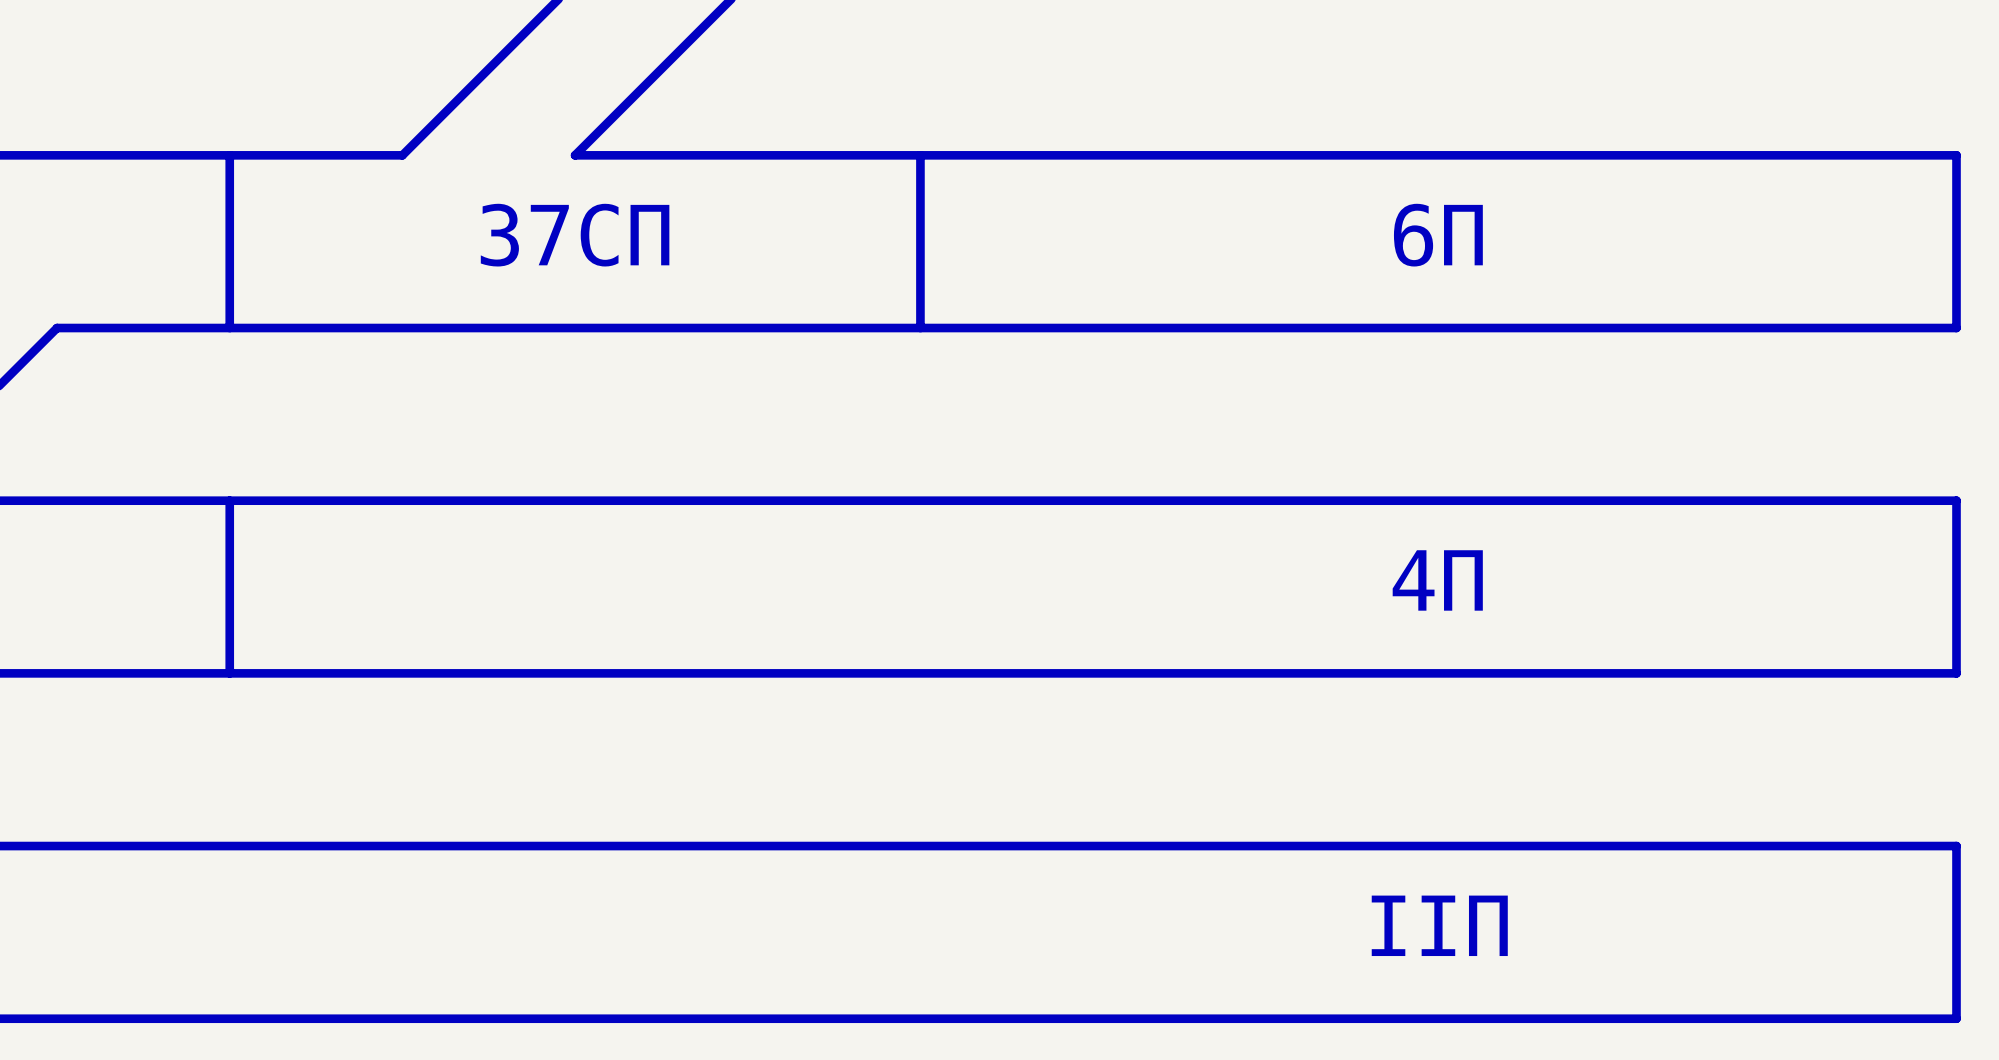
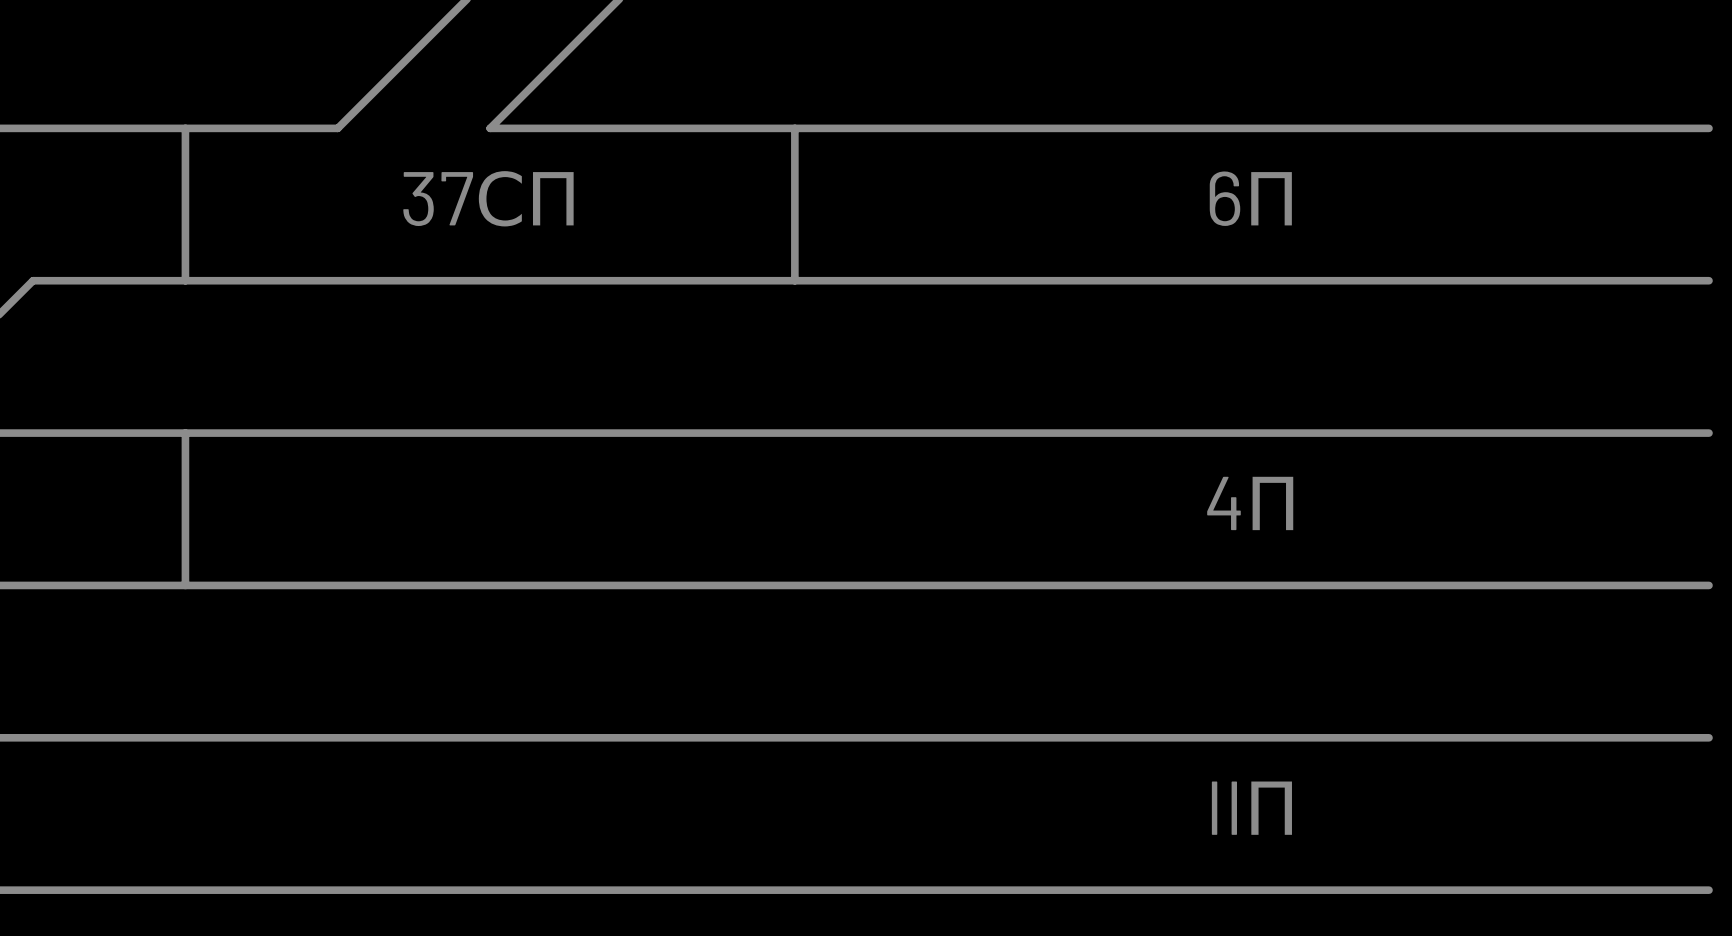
line: (1956, 155) (1956, 328) -> none
line: (1956, 500) (1956, 673) -> none
line: (1956, 846) (1956, 1018) -> none

